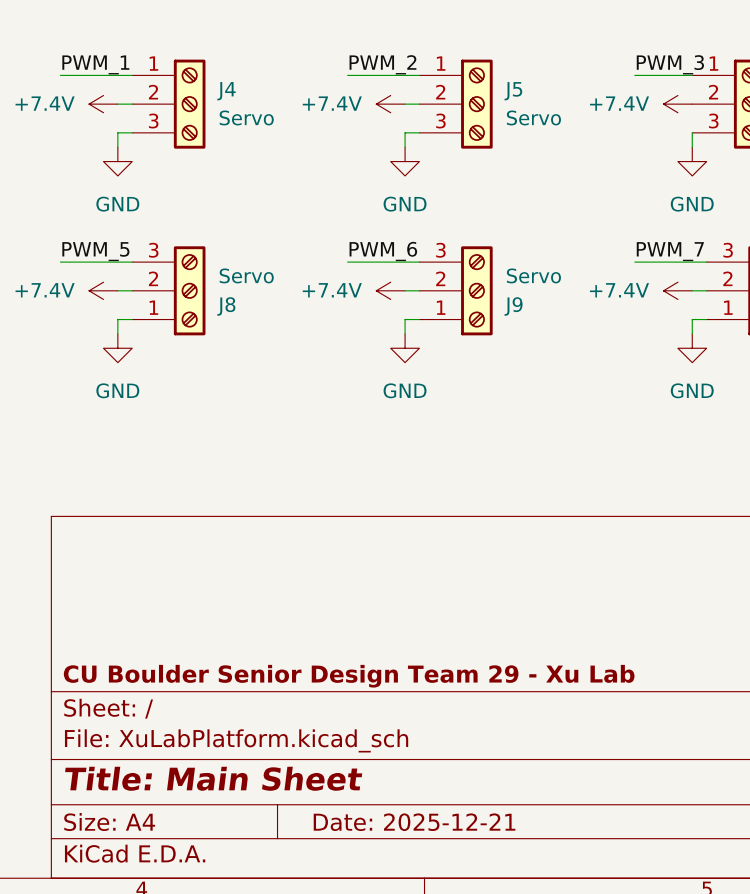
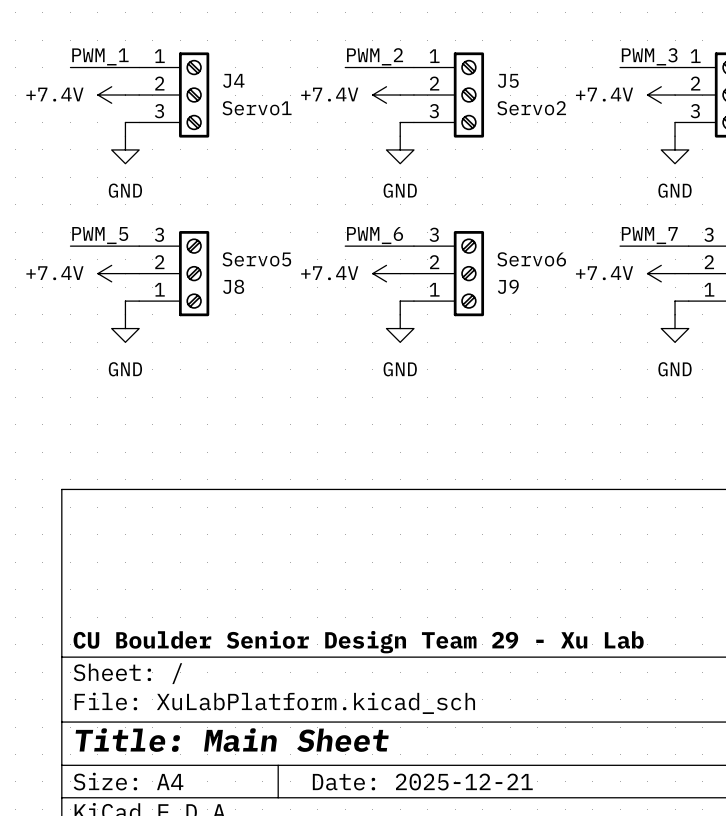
J4 value: Servo (246, 117) -> Servo1 (257, 108)
J5 value: Servo (533, 117) -> Servo2 (531, 108)
J8 value: Servo (246, 275) -> Servo5 (256, 259)
J9 value: Servo (533, 275) -> Servo6 (531, 259)

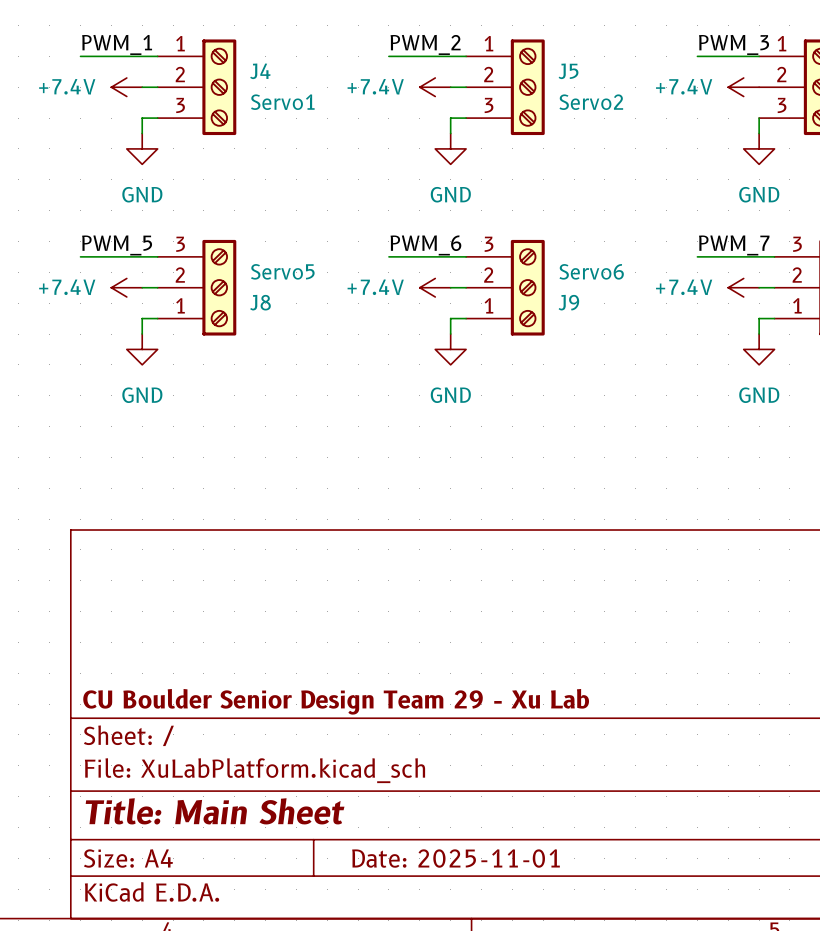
title block: Date: 2025-12-21 (422, 782) -> Date: 2025-11-01 (456, 858)

